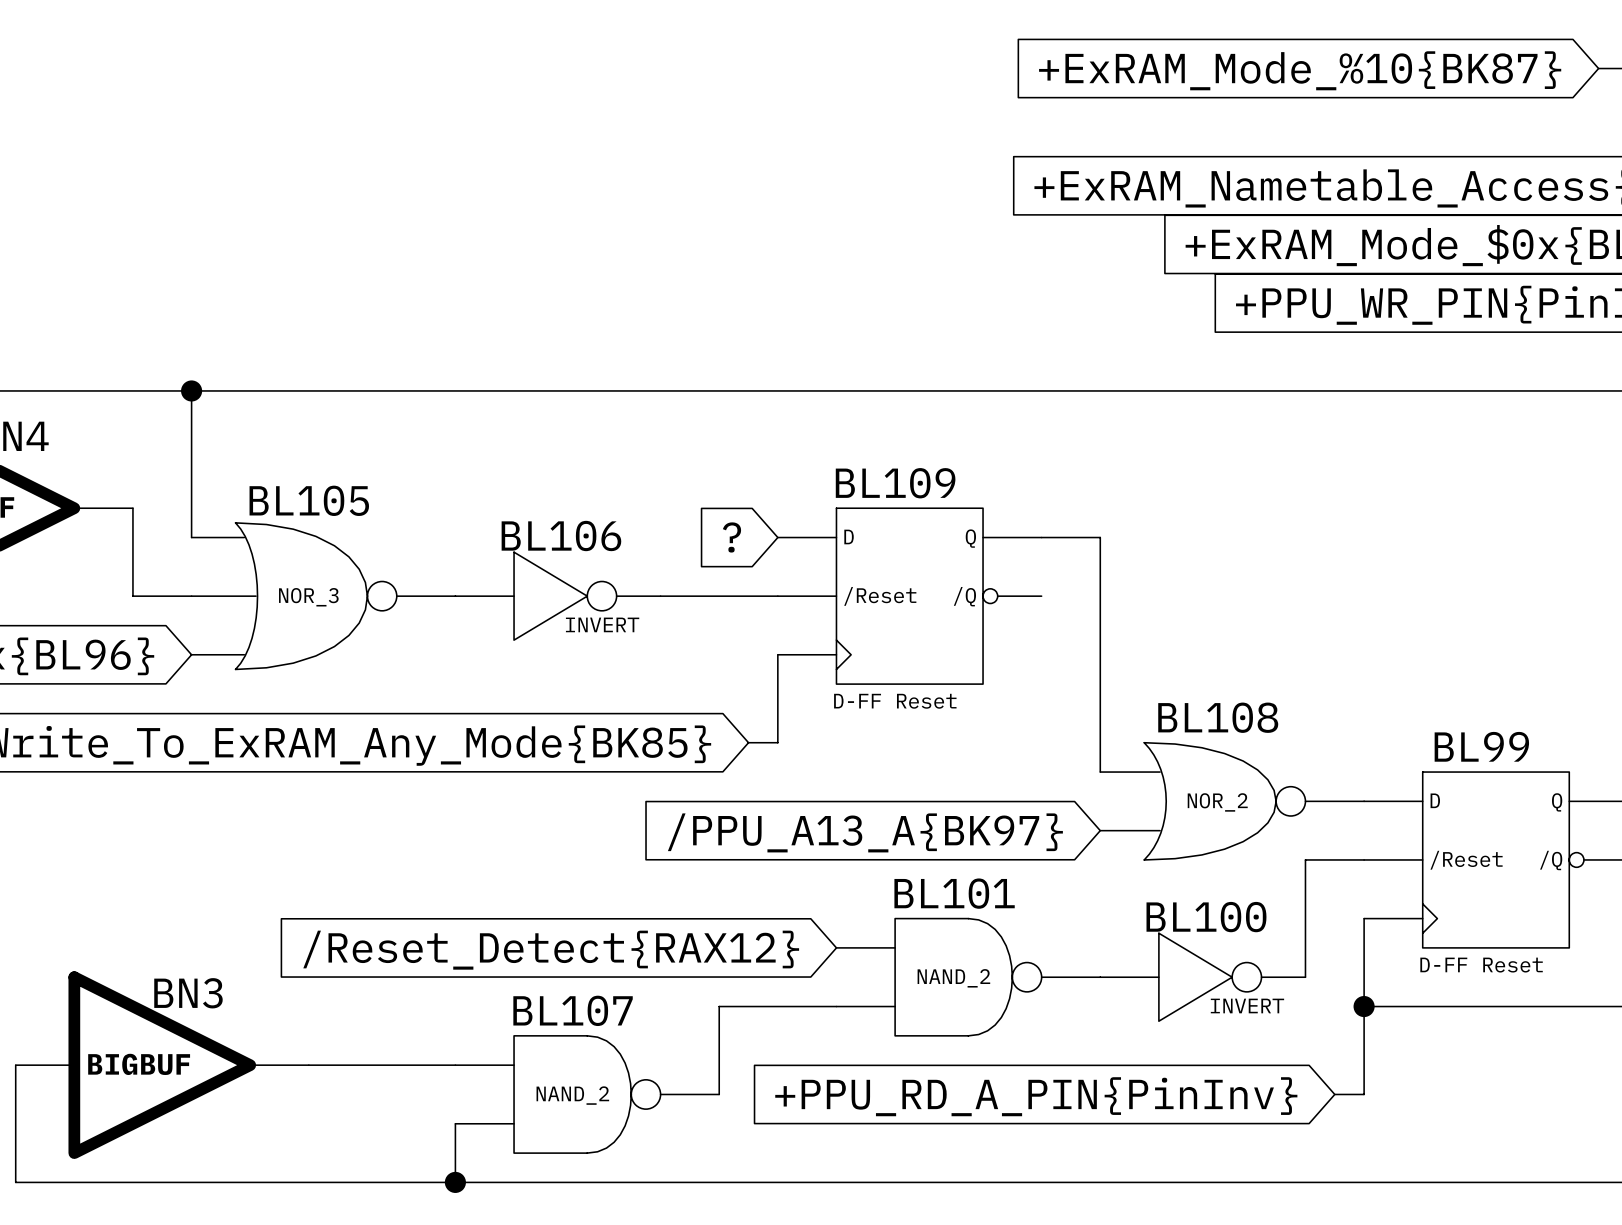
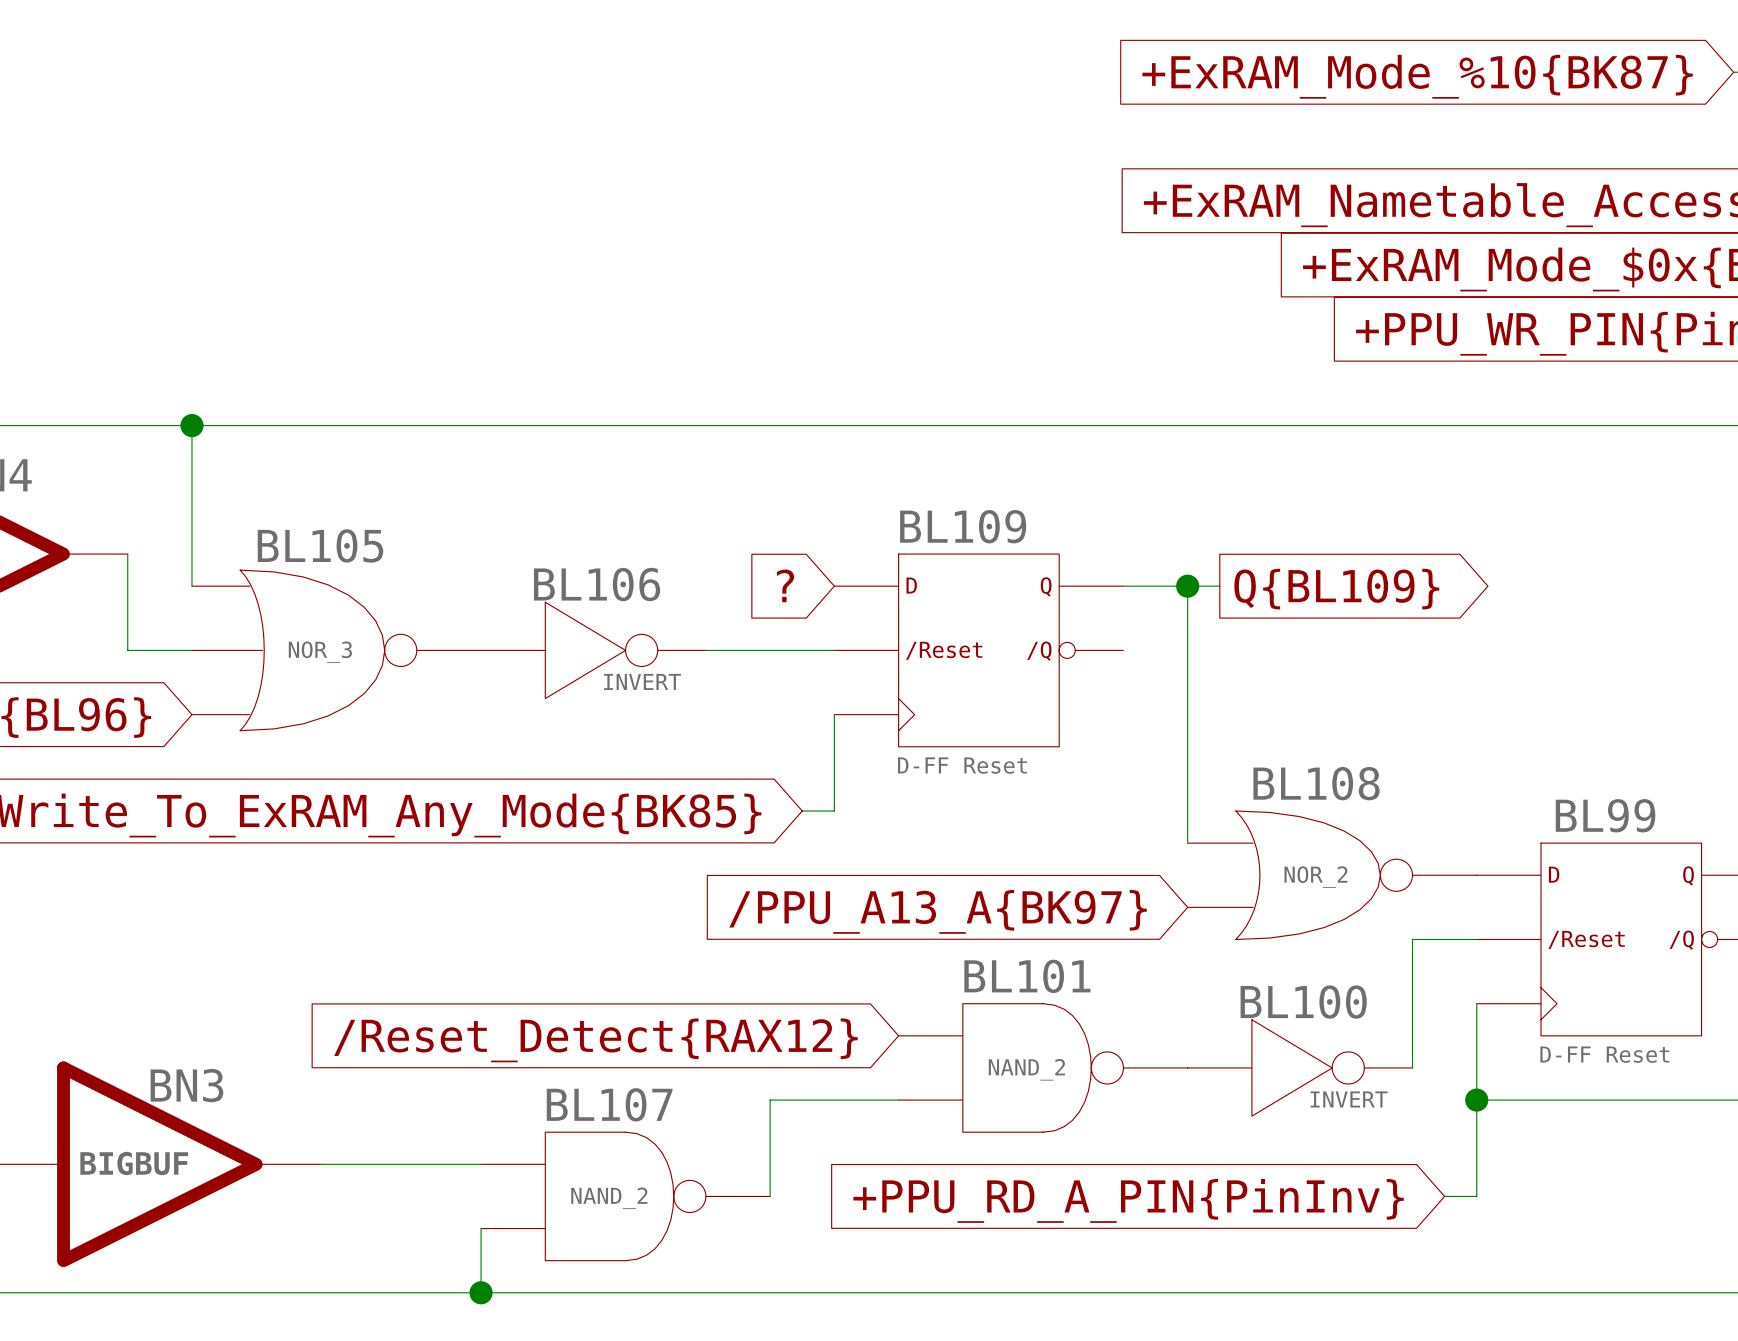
wire: none -> (1187, 586) (1219, 586)
junction: none -> (1187, 586)
global label: none -> Q{BL109} (1336, 589)

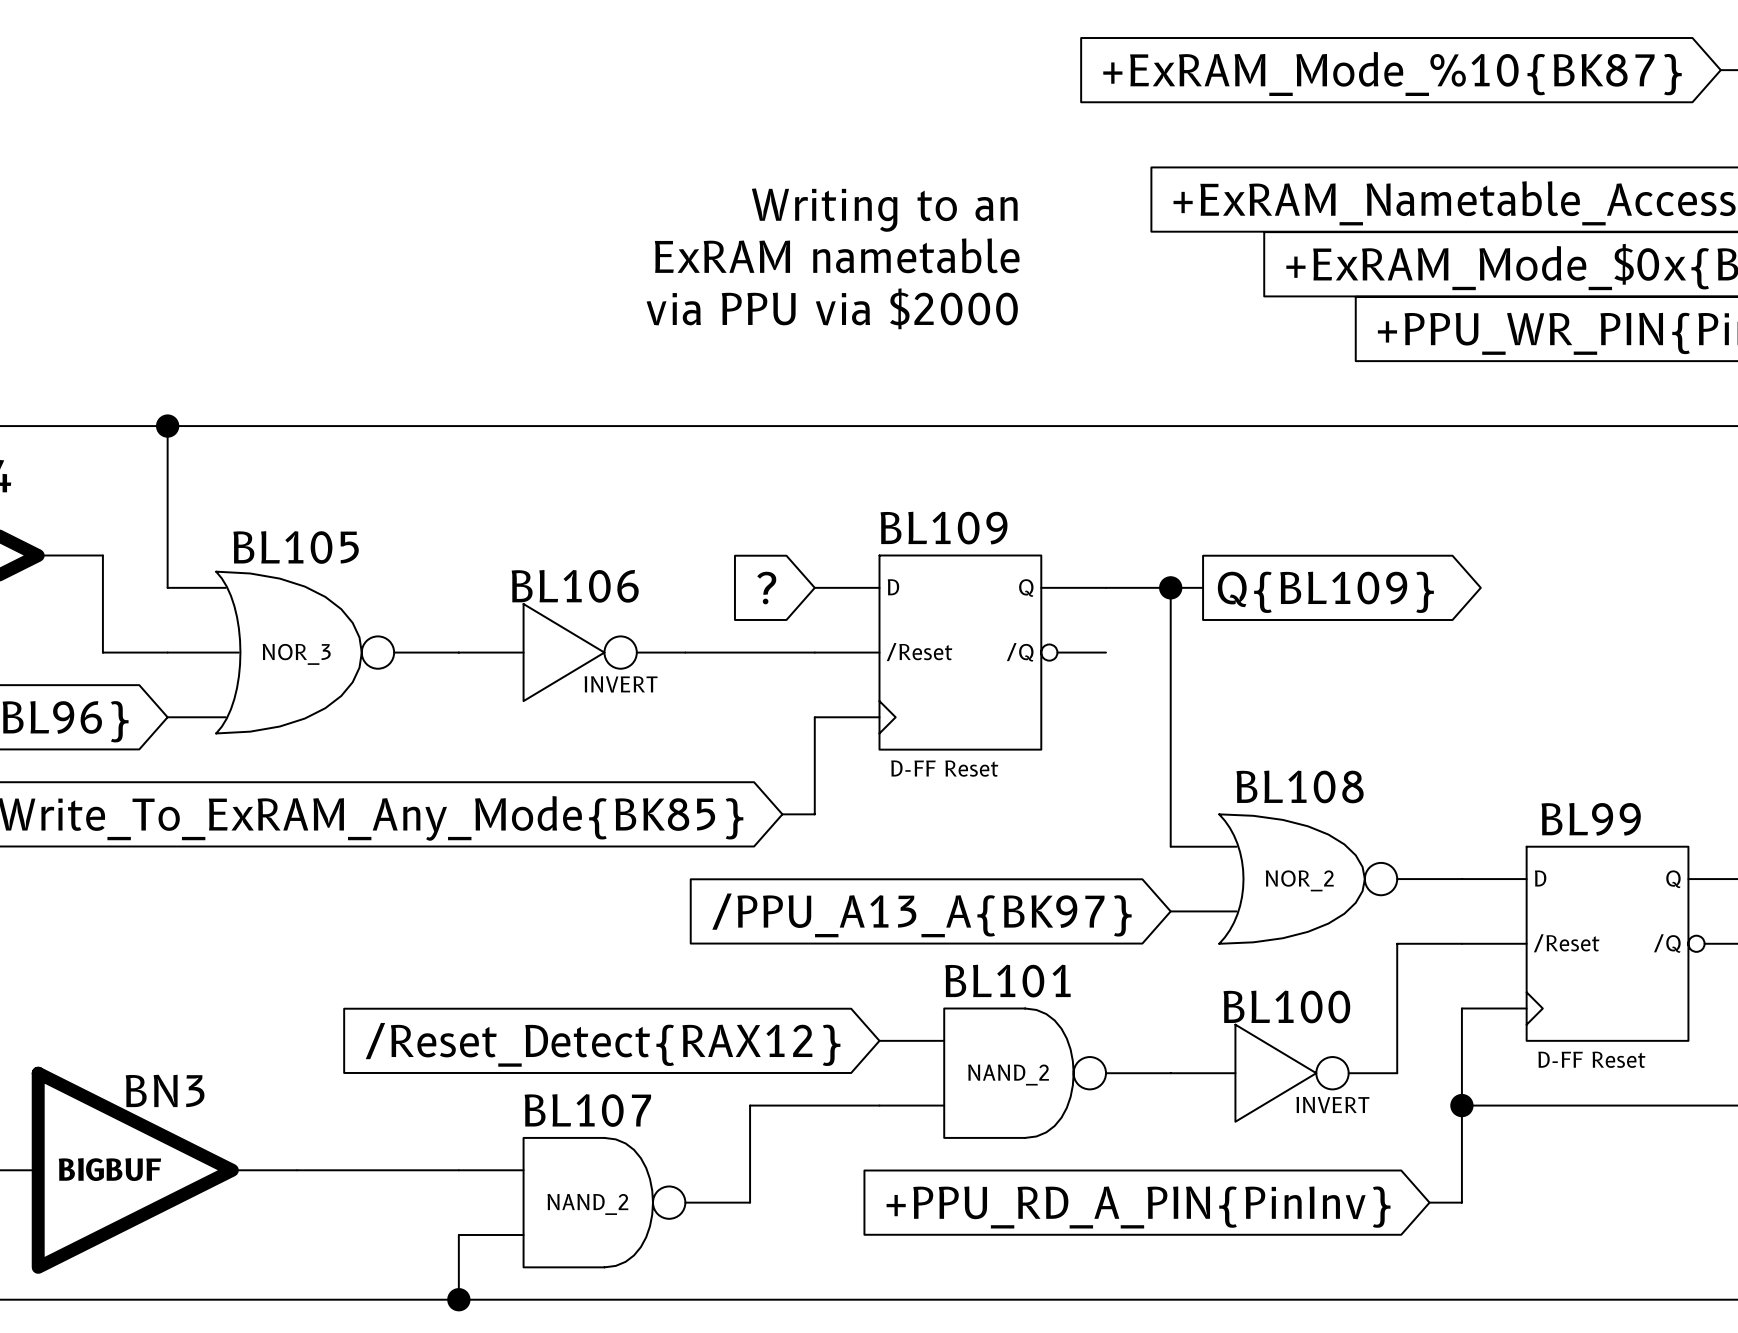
text: none -> Writing to an (884, 210)
text: none -> ExRAM nametable (837, 255)
text: none -> via PPU via $2000 (832, 308)

